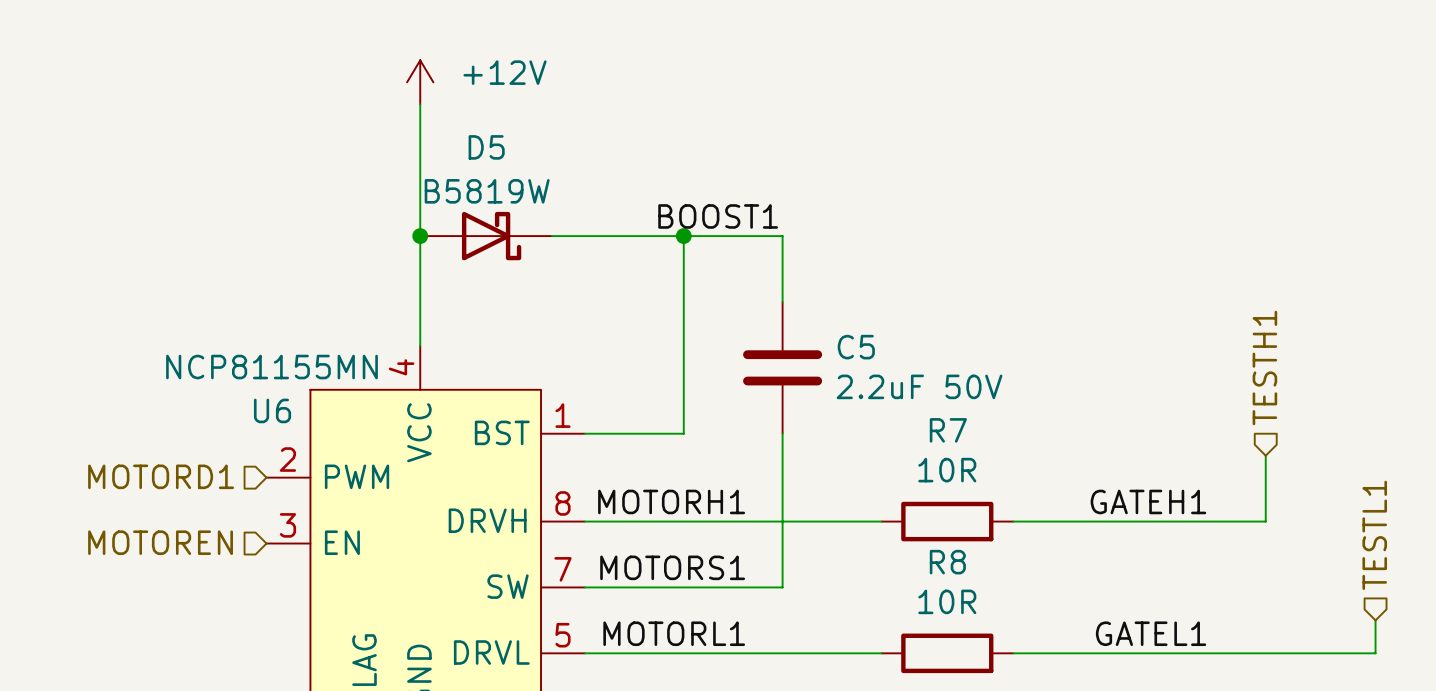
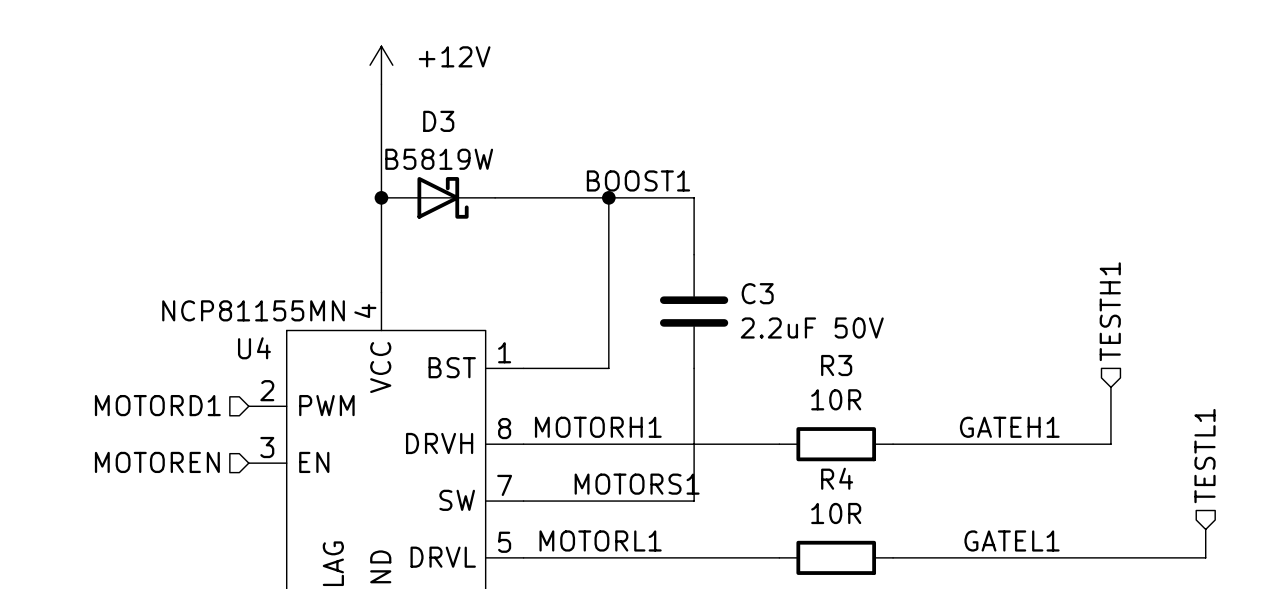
D5 name: D5 (486, 147) -> D3 (438, 121)
C5 name: C5 (856, 347) -> C3 (757, 293)
U6 name: U6 (272, 410) -> U4 (254, 348)
R7 name: R7 (948, 430) -> R3 (836, 365)
R8 name: R8 (947, 562) -> R4 (837, 478)
label position: MOTORS1 (672, 567) -> MOTORS1 (637, 484)

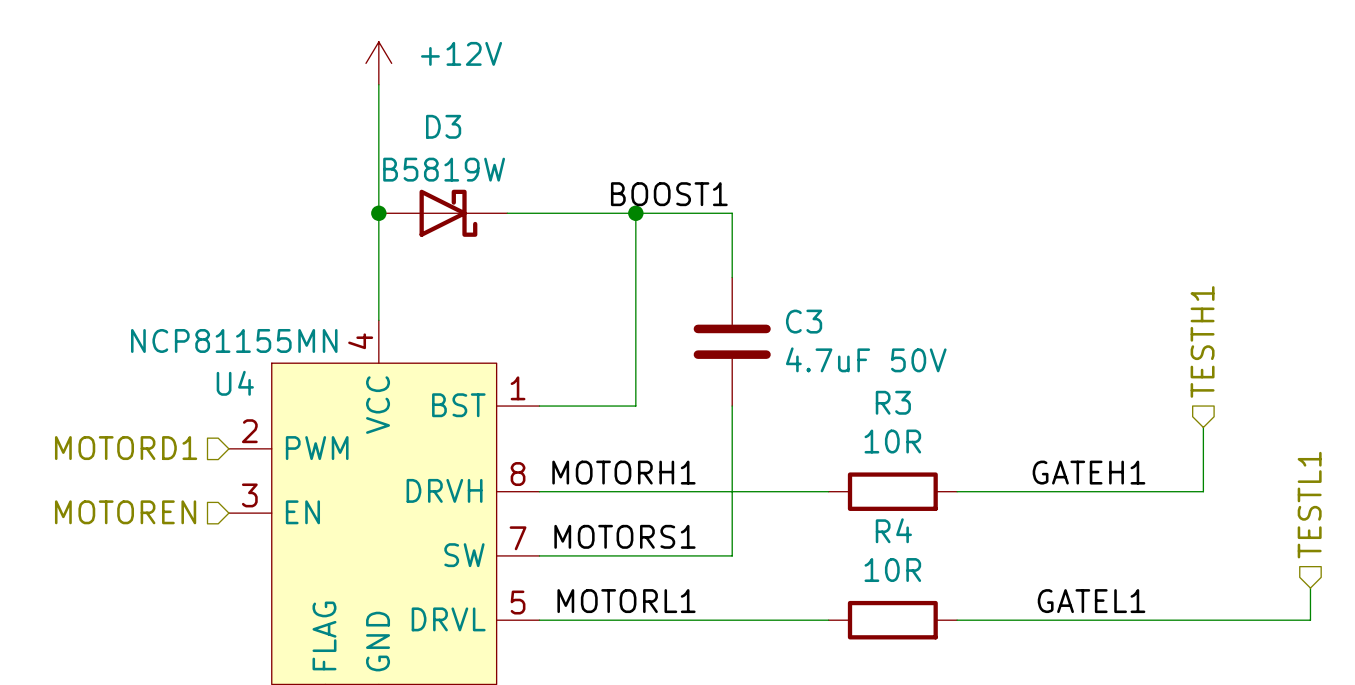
C3 value: 2.2uF 50V (812, 327) -> 4.7uF 50V (866, 359)
label position: MOTORS1 (637, 484) -> MOTORS1 (624, 536)

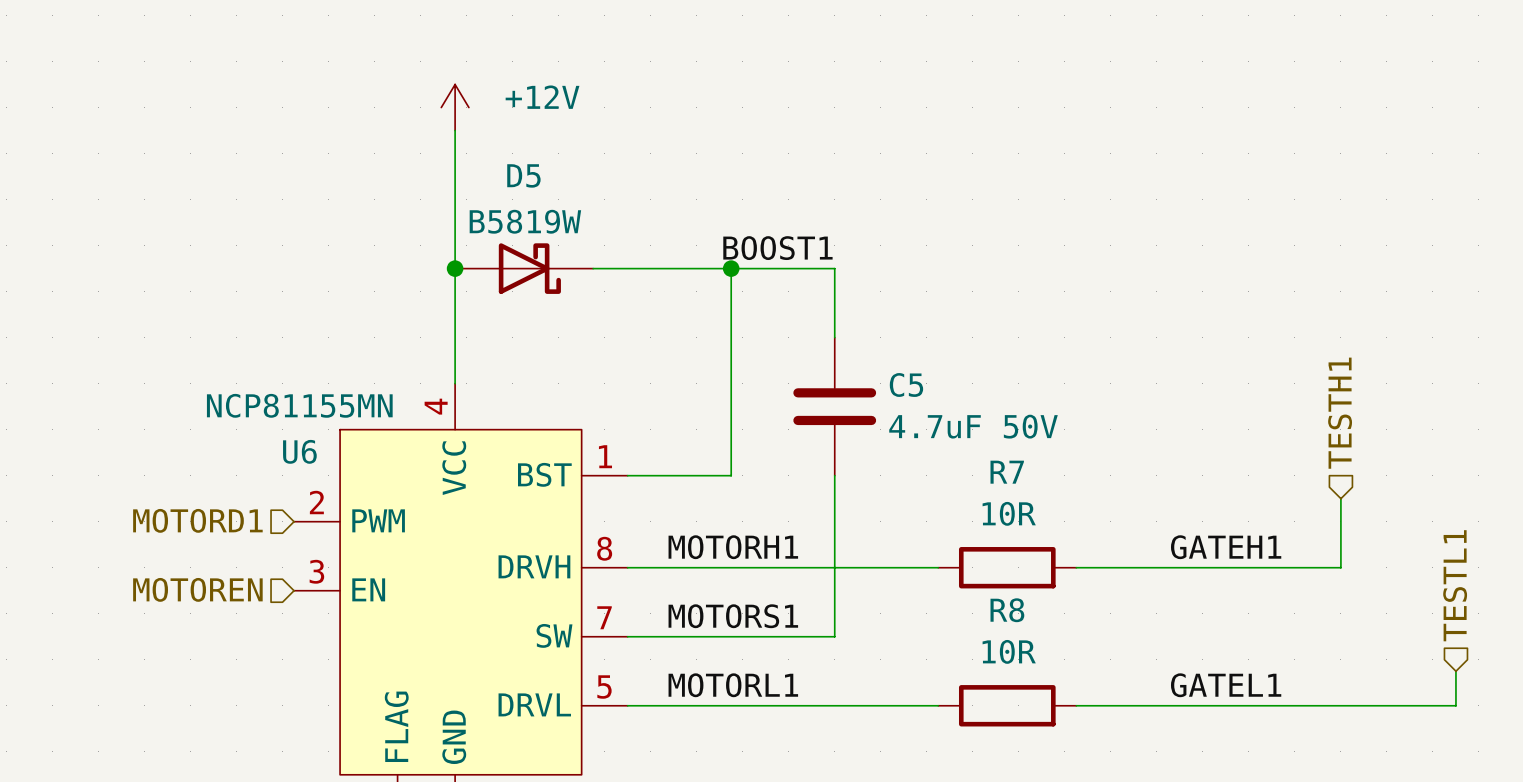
D3 name: D3 (443, 126) -> D5 (523, 175)
C3 name: C3 (804, 321) -> C5 (906, 384)
U4 name: U4 (235, 383) -> U6 (299, 451)
R3 name: R3 (893, 402) -> R7 (1007, 472)
R4 name: R4 (893, 530) -> R8 (1007, 610)

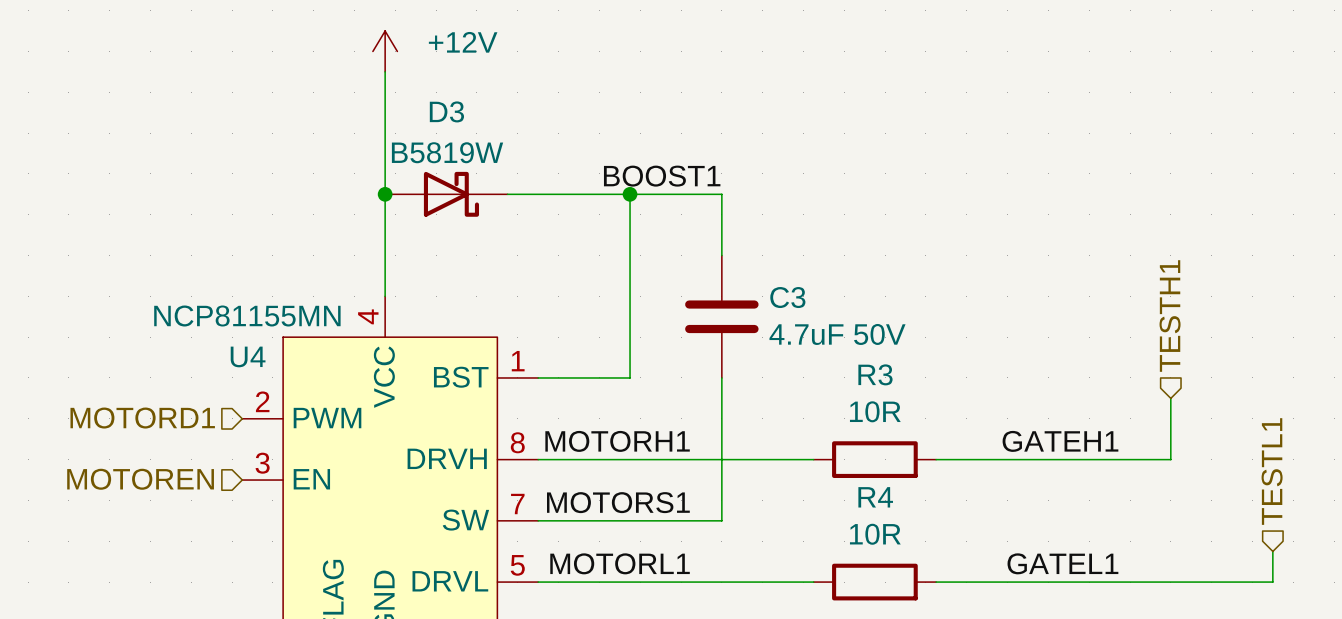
D5 name: D5 (523, 175) -> D3 (446, 111)
C5 name: C5 (906, 384) -> C3 (787, 297)
U6 name: U6 (299, 451) -> U4 (248, 356)
R7 name: R7 (1007, 472) -> R3 (875, 374)
R8 name: R8 (1007, 610) -> R4 (875, 497)

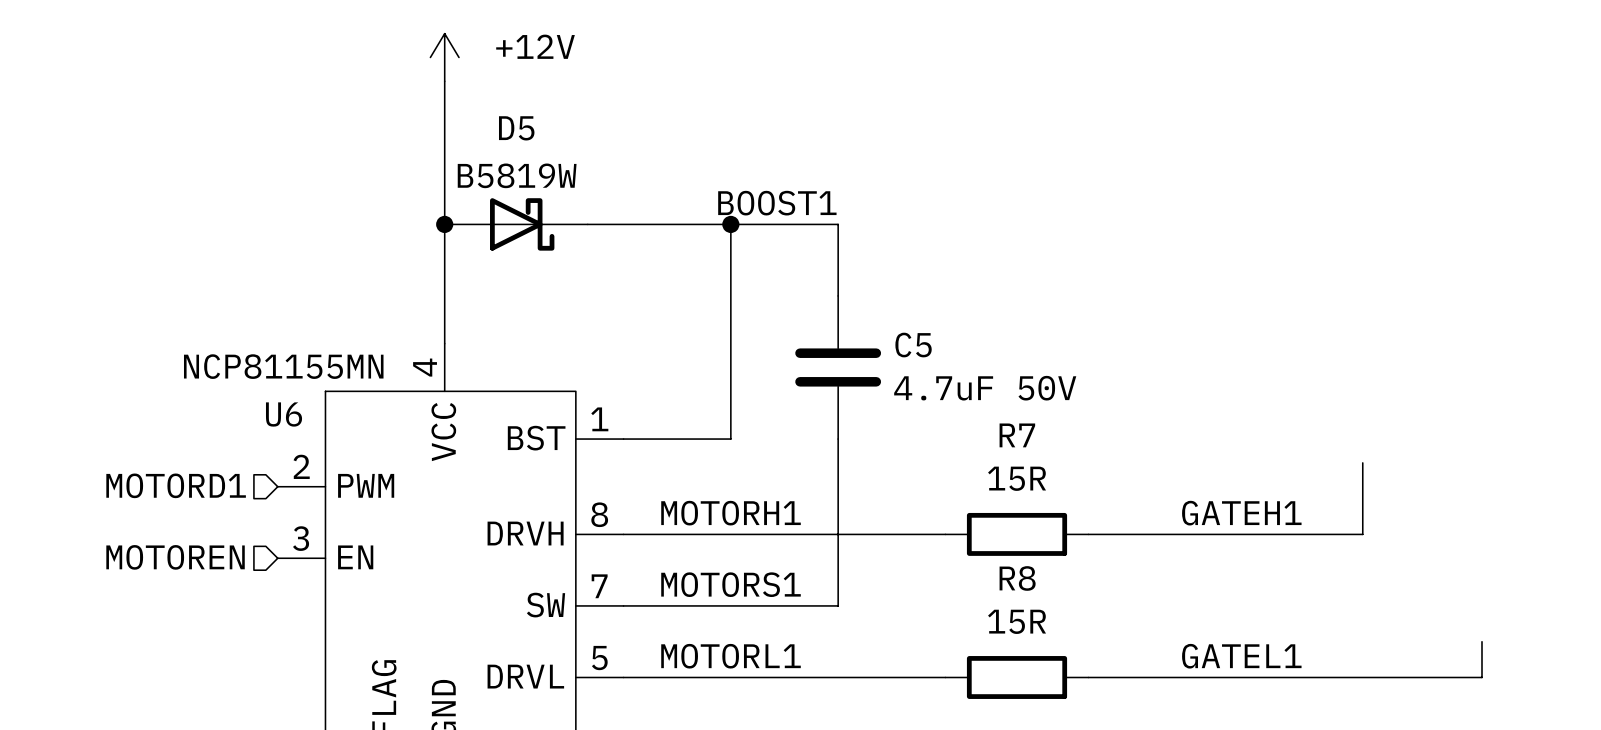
D3 name: D3 (446, 111) -> D5 (516, 128)
C3 name: C3 (787, 297) -> C5 (913, 345)
hierarchical label: TESTH1 (1170, 316) -> none
U4 name: U4 (248, 356) -> U6 (284, 414)
R3 name: R3 (875, 374) -> R7 (1017, 435)
R3 value: 10R (875, 411) -> 15R (1017, 478)
hierarchical label: TESTL1 (1272, 471) -> none
R4 name: R4 (875, 497) -> R8 (1017, 578)
R4 value: 10R (875, 534) -> 15R (1017, 621)

